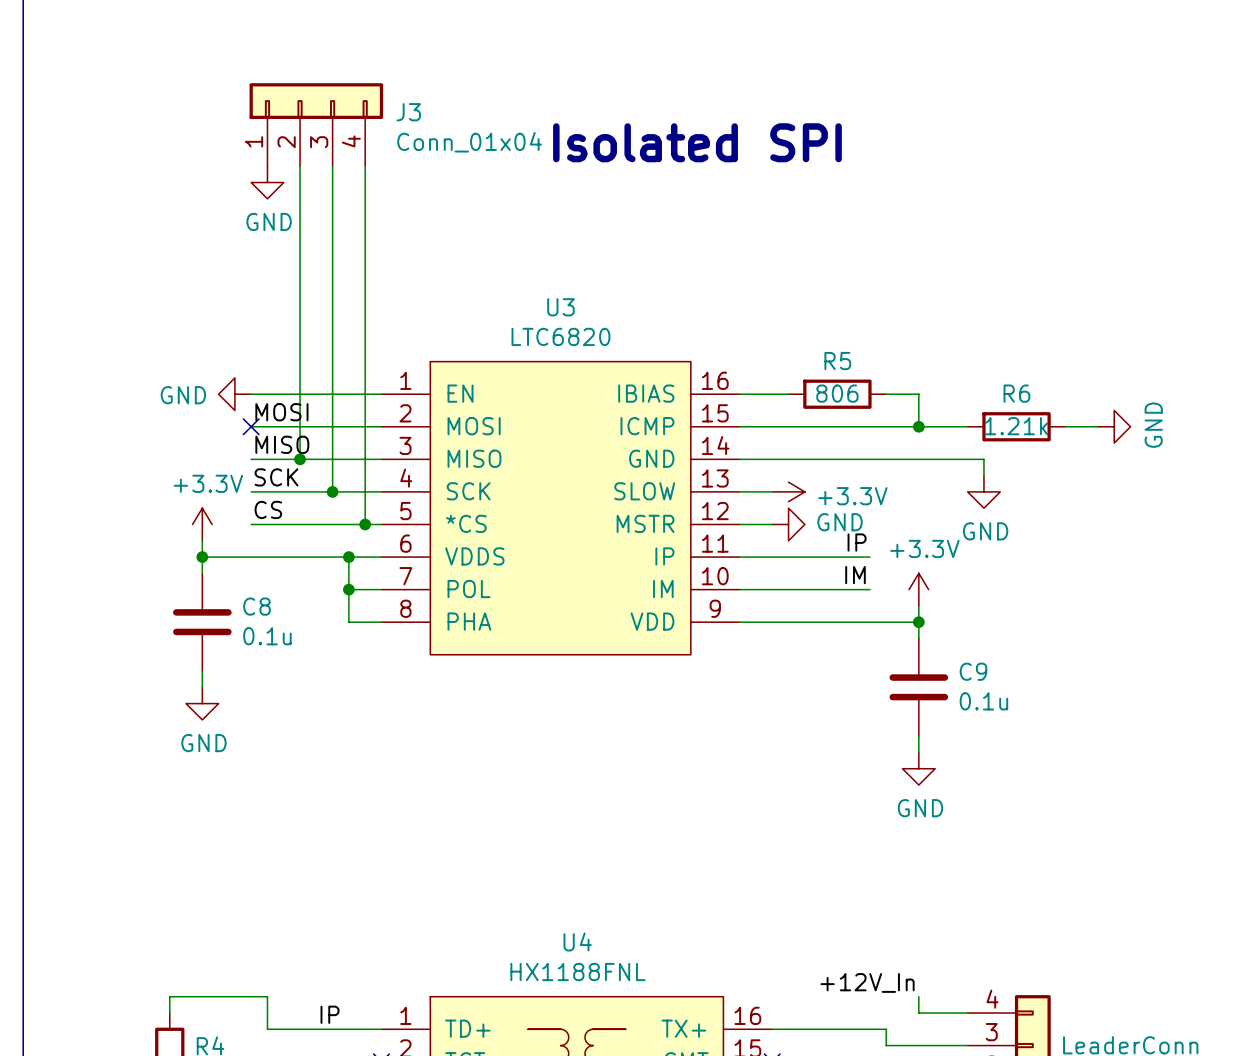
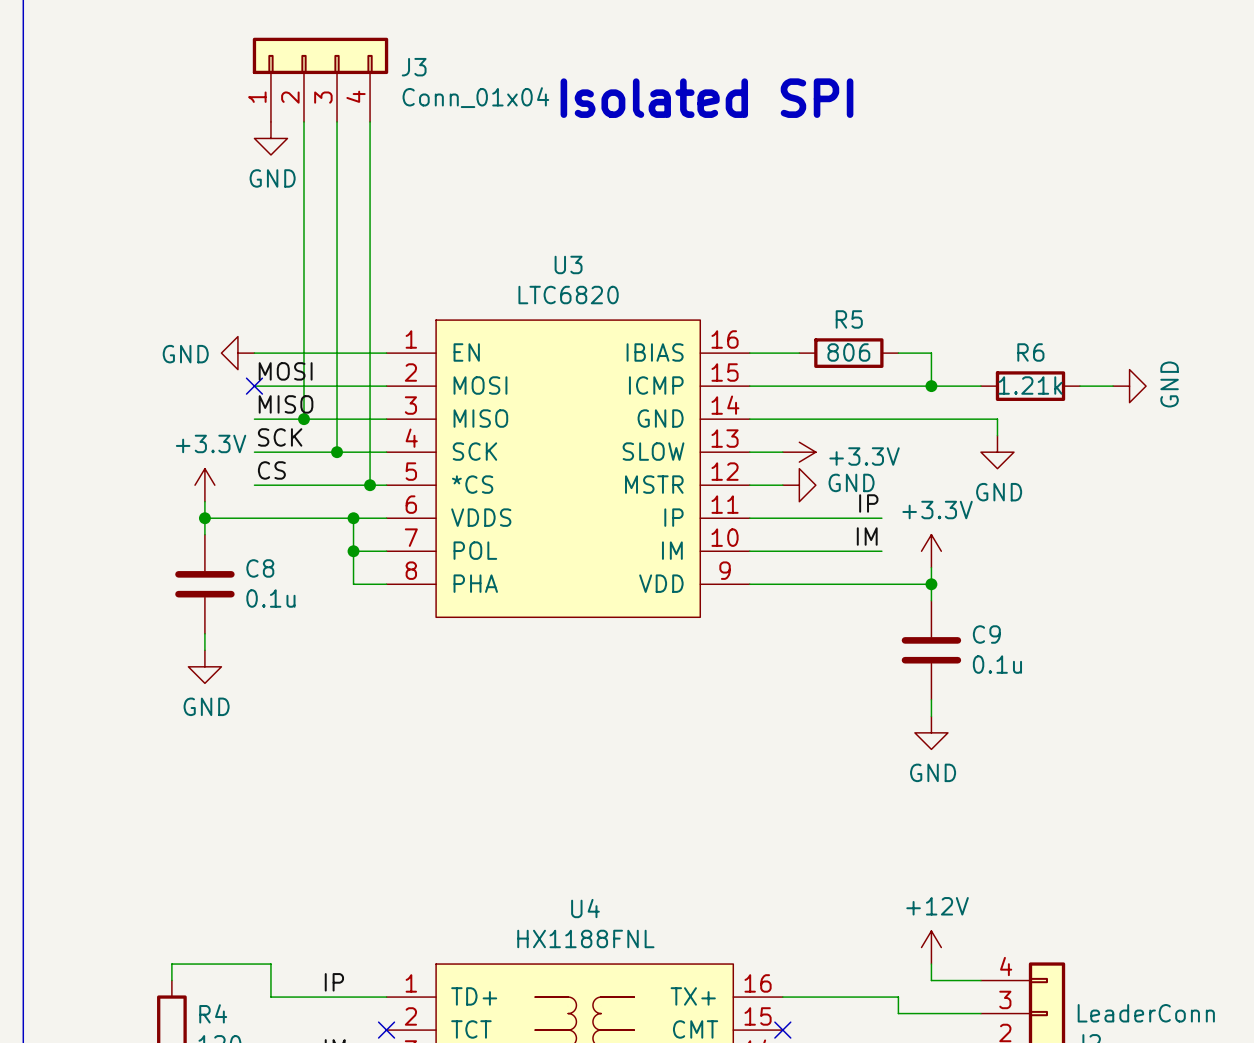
power symbol: none -> +12V (931, 947)
label: +12V_In (867, 982) -> none

